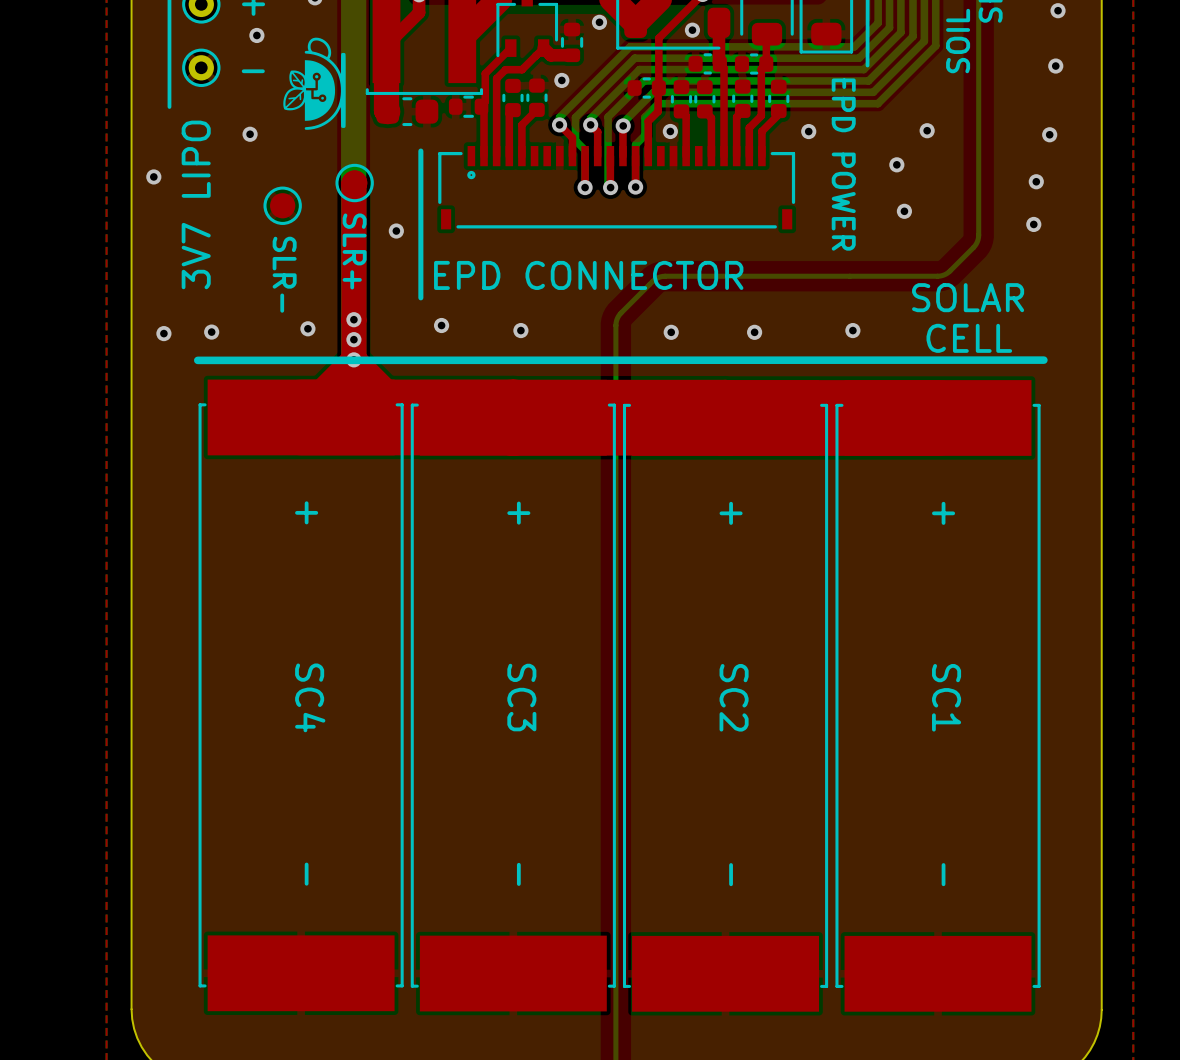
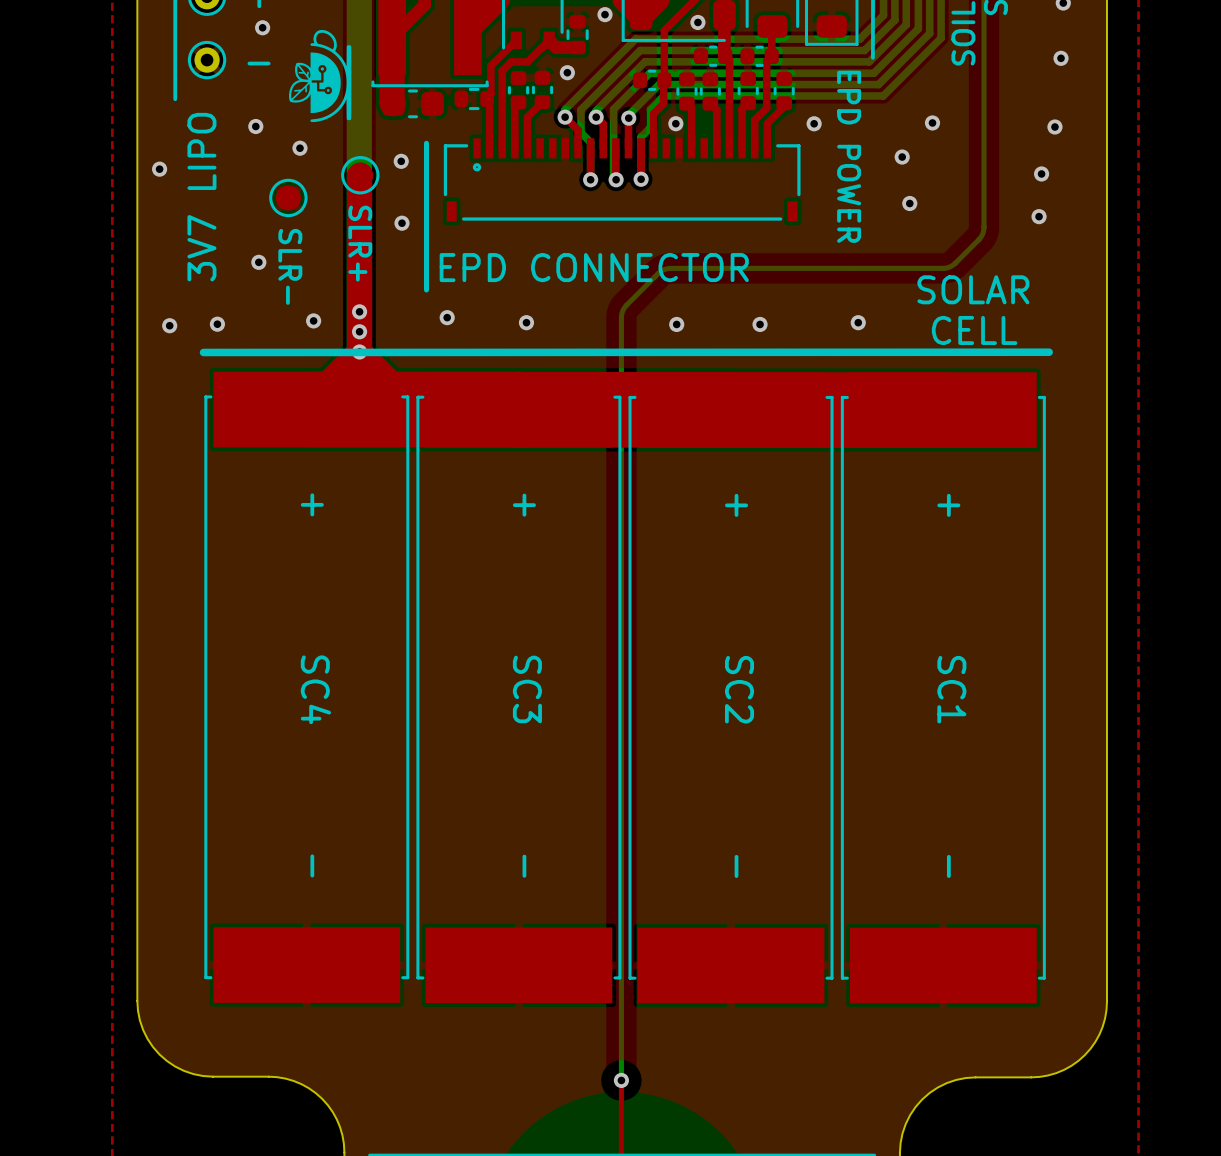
via: none -> (299, 148)
via: none -> (401, 161)
via: none -> (258, 262)

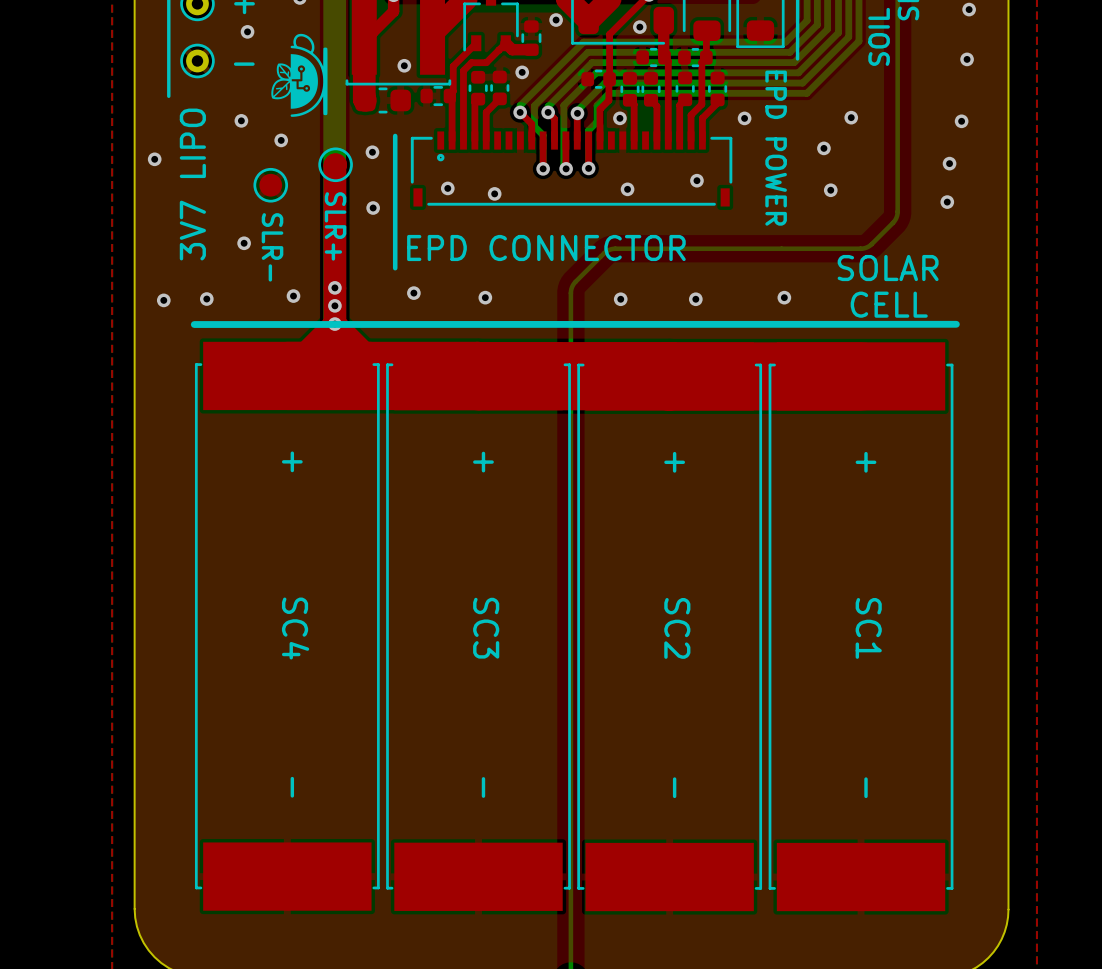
via: none -> (404, 65)
via: none -> (696, 180)
via: none -> (447, 188)
via: none -> (627, 189)
via: none -> (494, 193)

